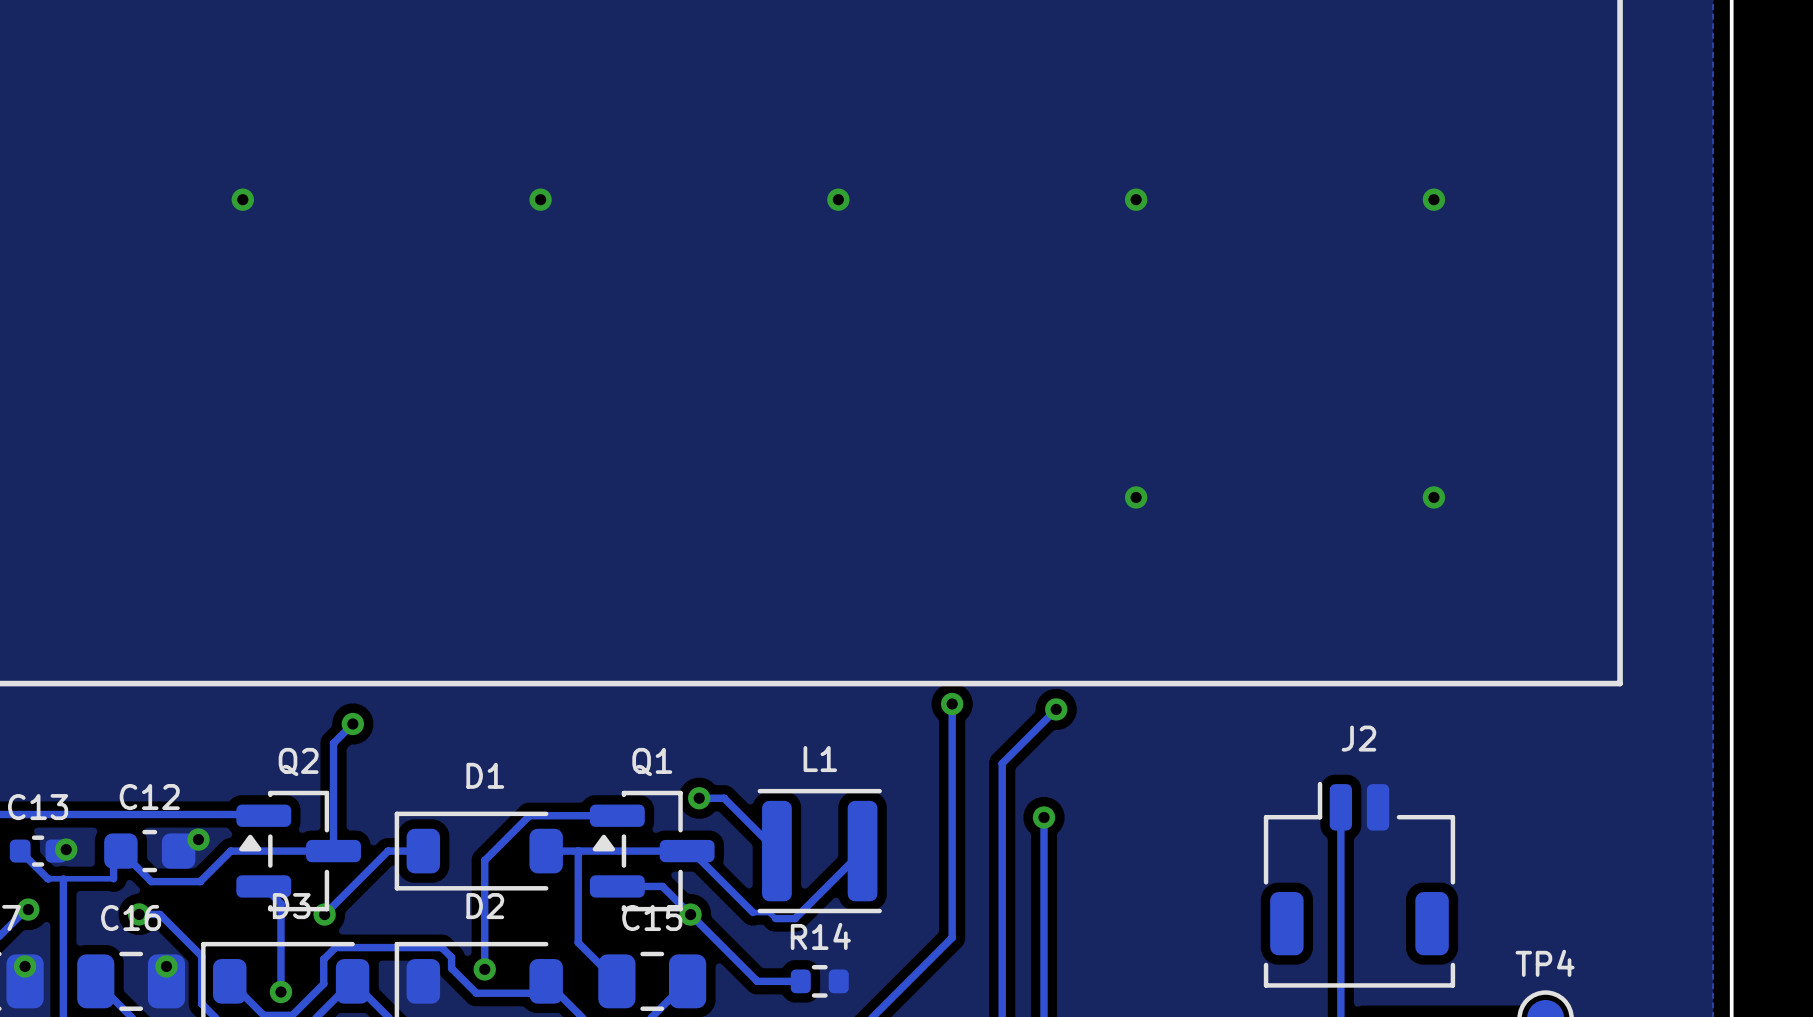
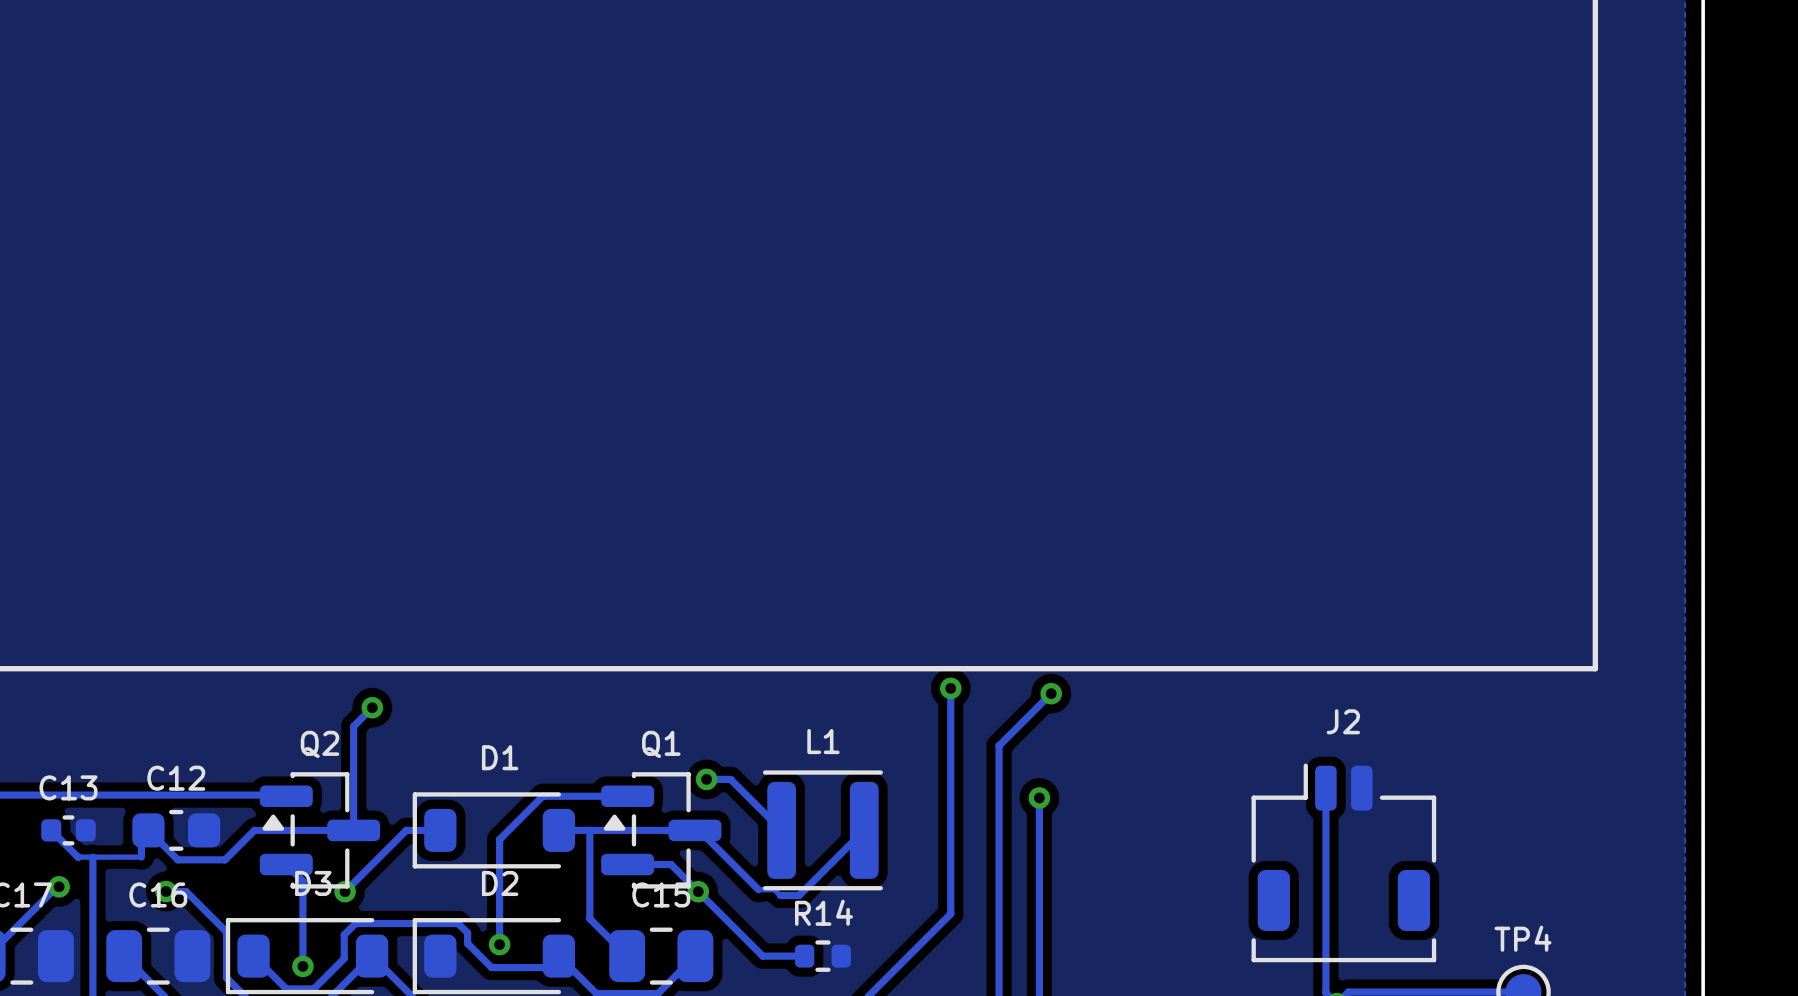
via: (242, 199) -> none
via: (540, 199) -> none
via: (838, 199) -> none
via: (1136, 199) -> none
via: (1433, 199) -> none
via: (1136, 497) -> none
via: (1433, 497) -> none
via: (198, 839) -> none
via: (66, 849) -> none
via: (25, 966) -> none
via: (166, 966) -> none

